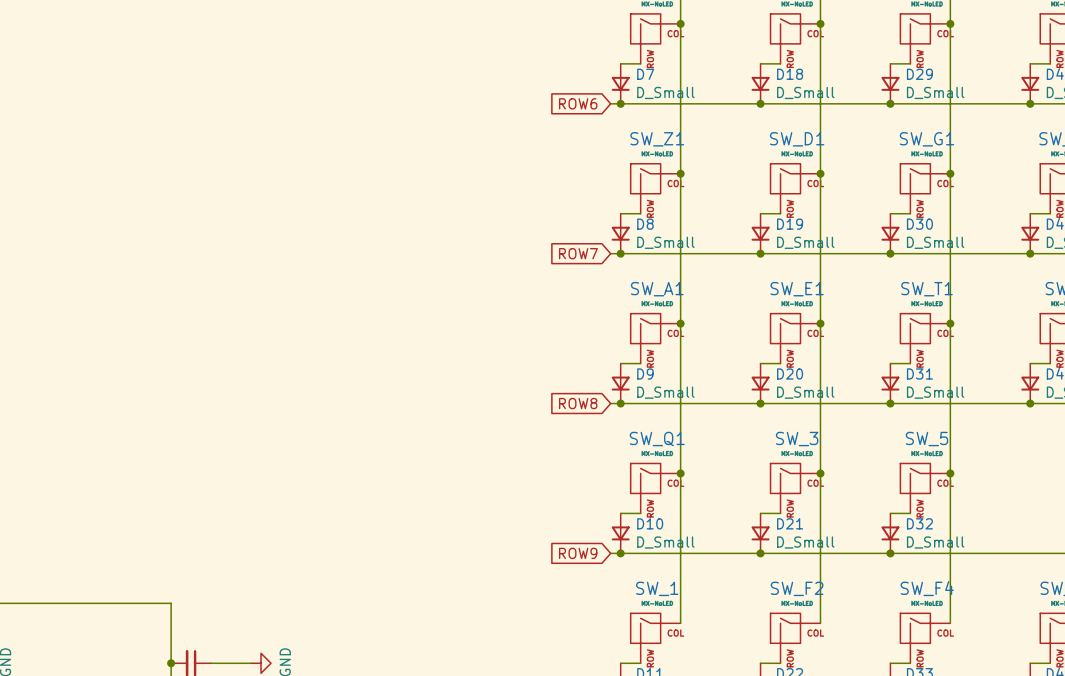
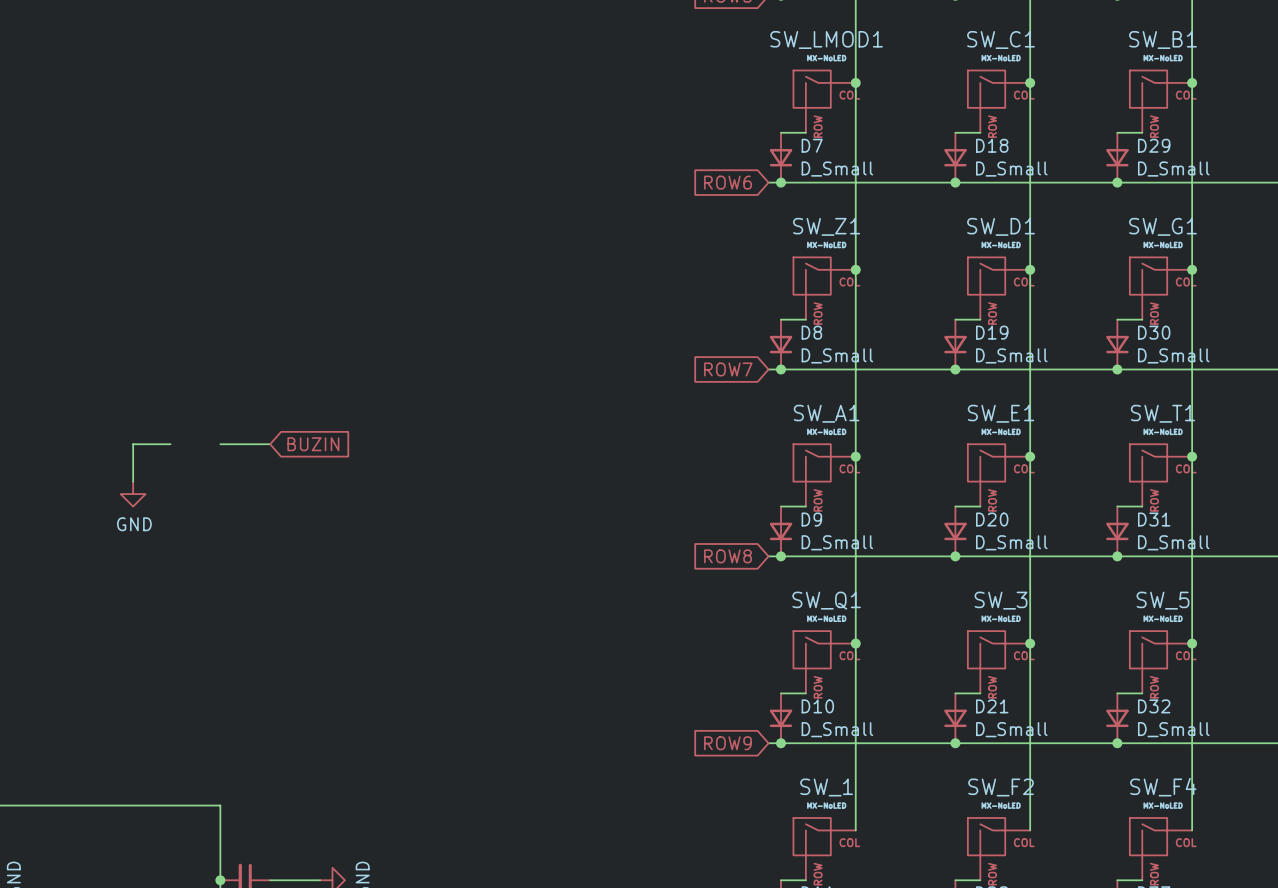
wire: none -> (170, 444) (133, 444) (133, 481)
wire: none -> (220, 444) (270, 444)
global label: none -> BUZIN (313, 444)
power symbol: none -> GND (133, 494)

